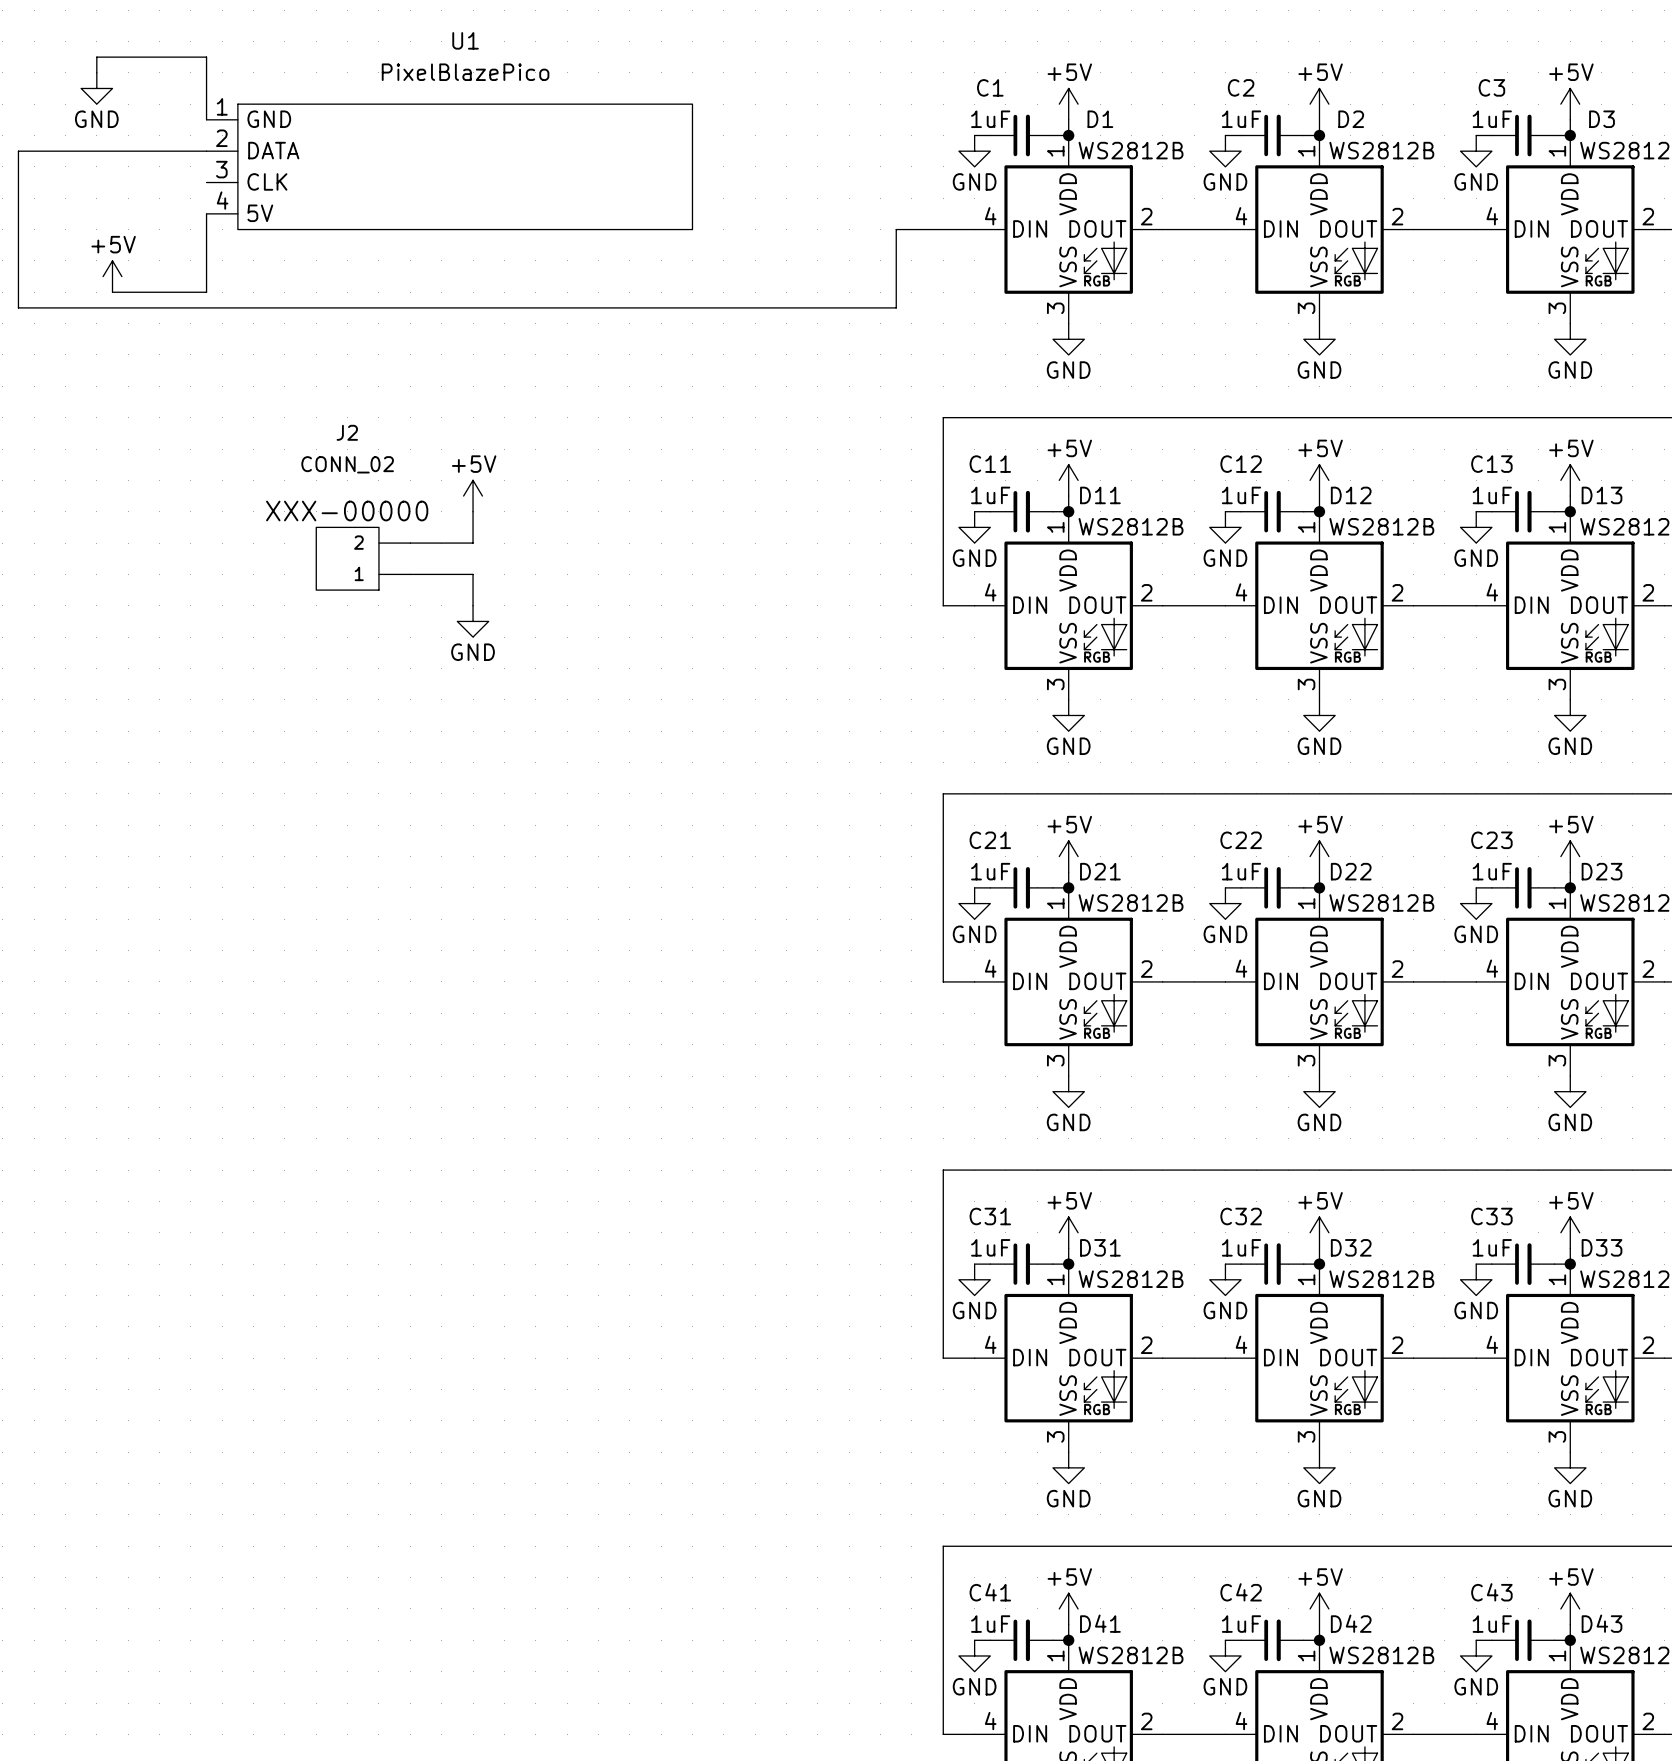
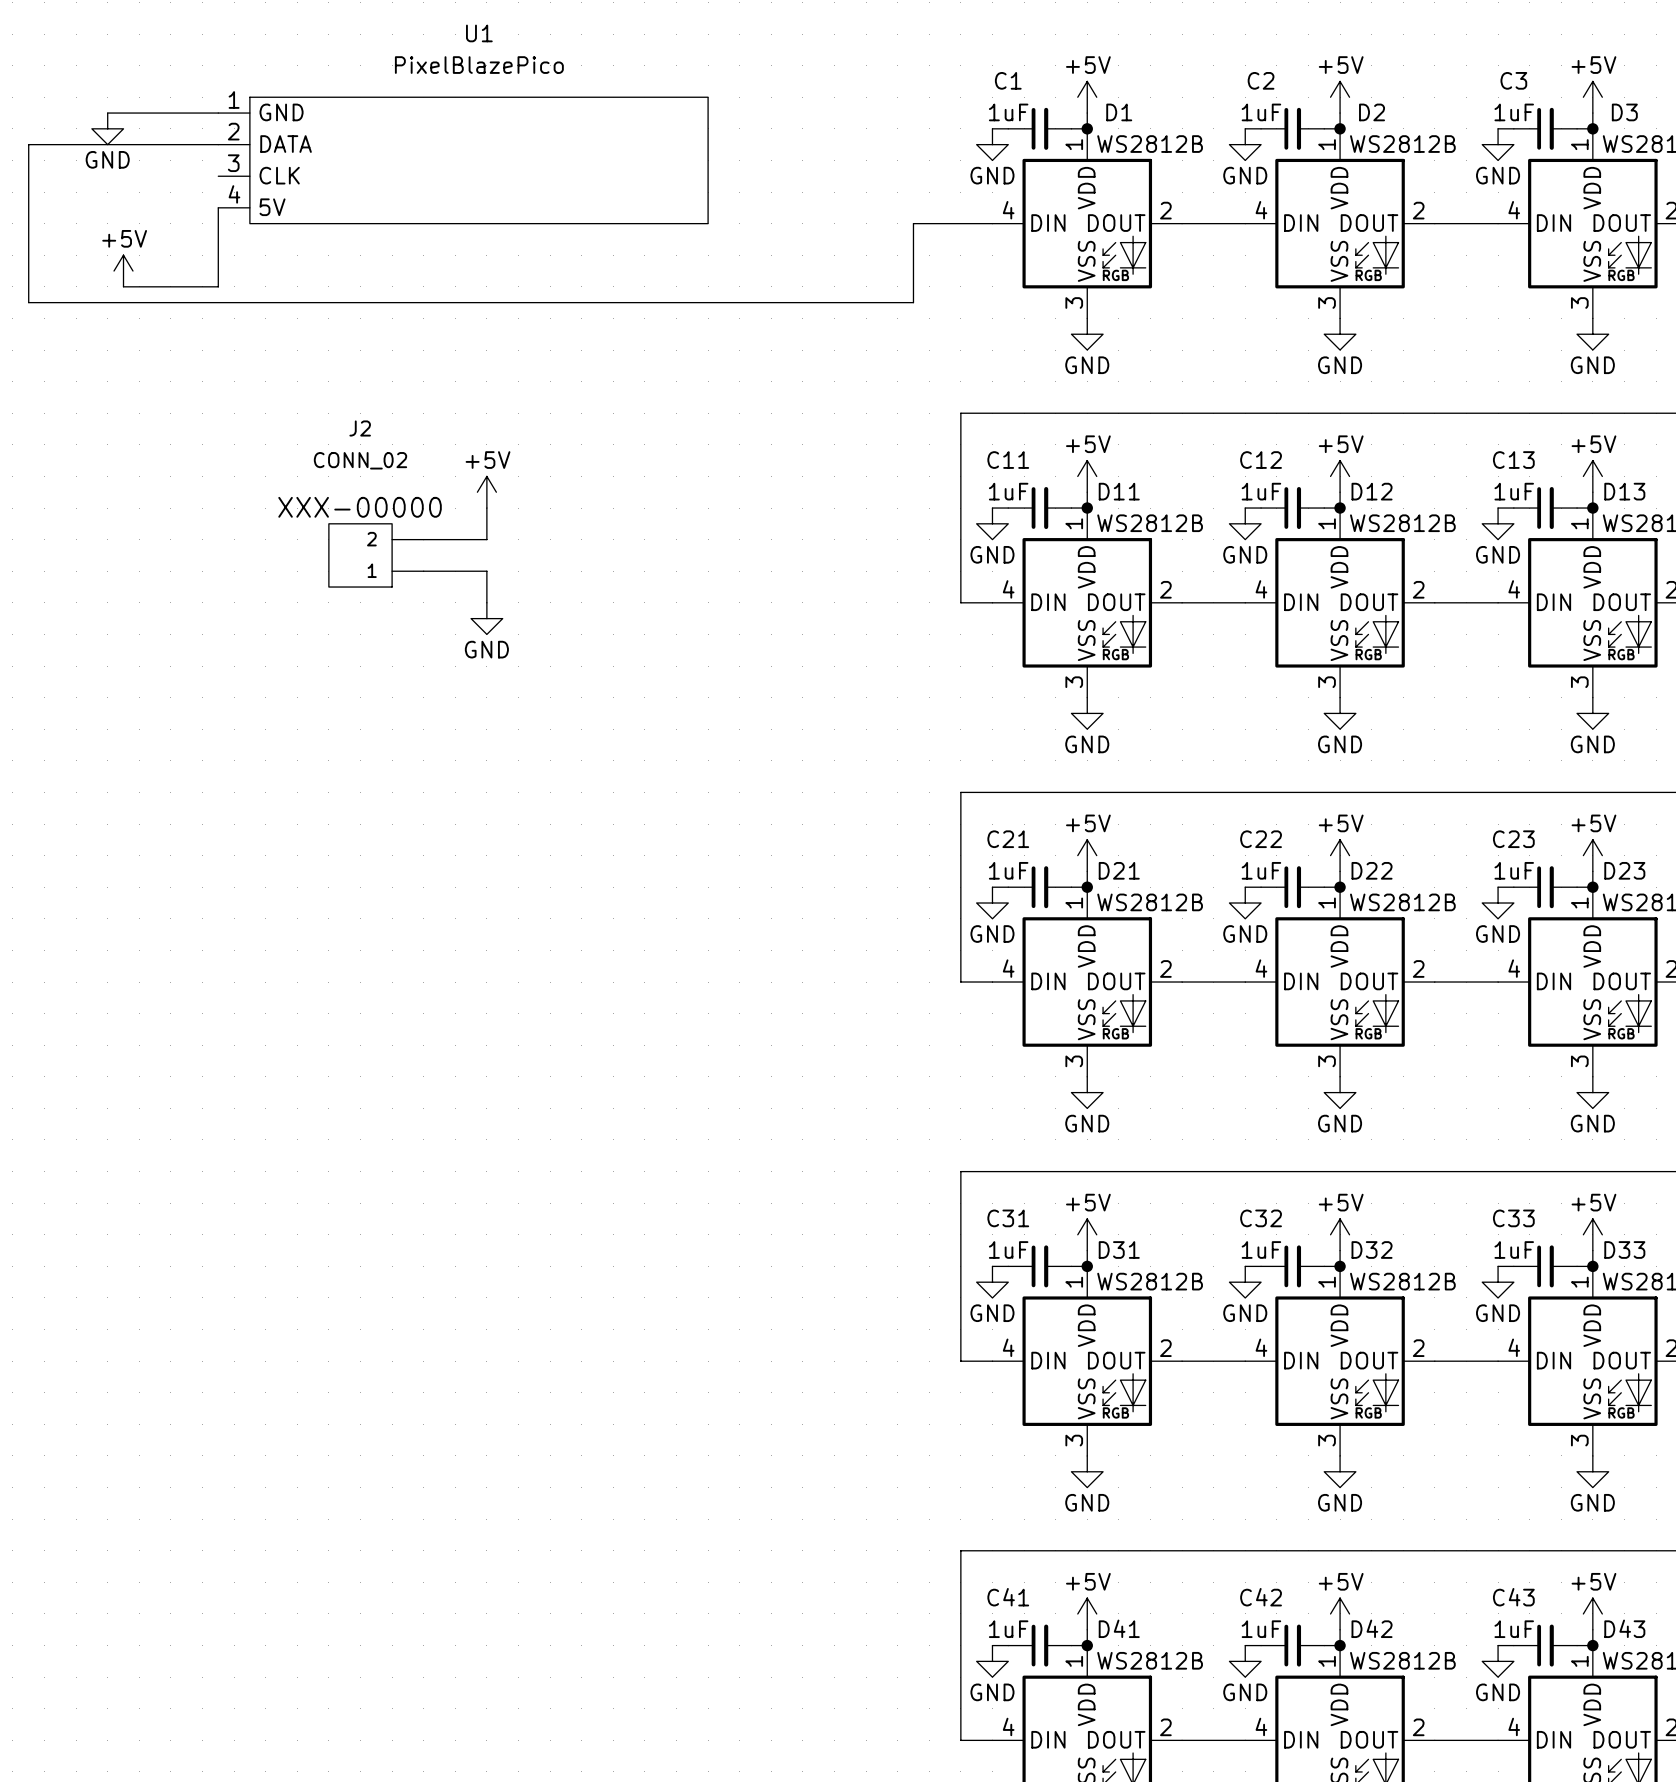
wire: (96, 72) (96, 57) (206, 57) (206, 119) -> (107, 113) (218, 113)
power symbol position: GND (96, 88) -> GND (107, 128)

